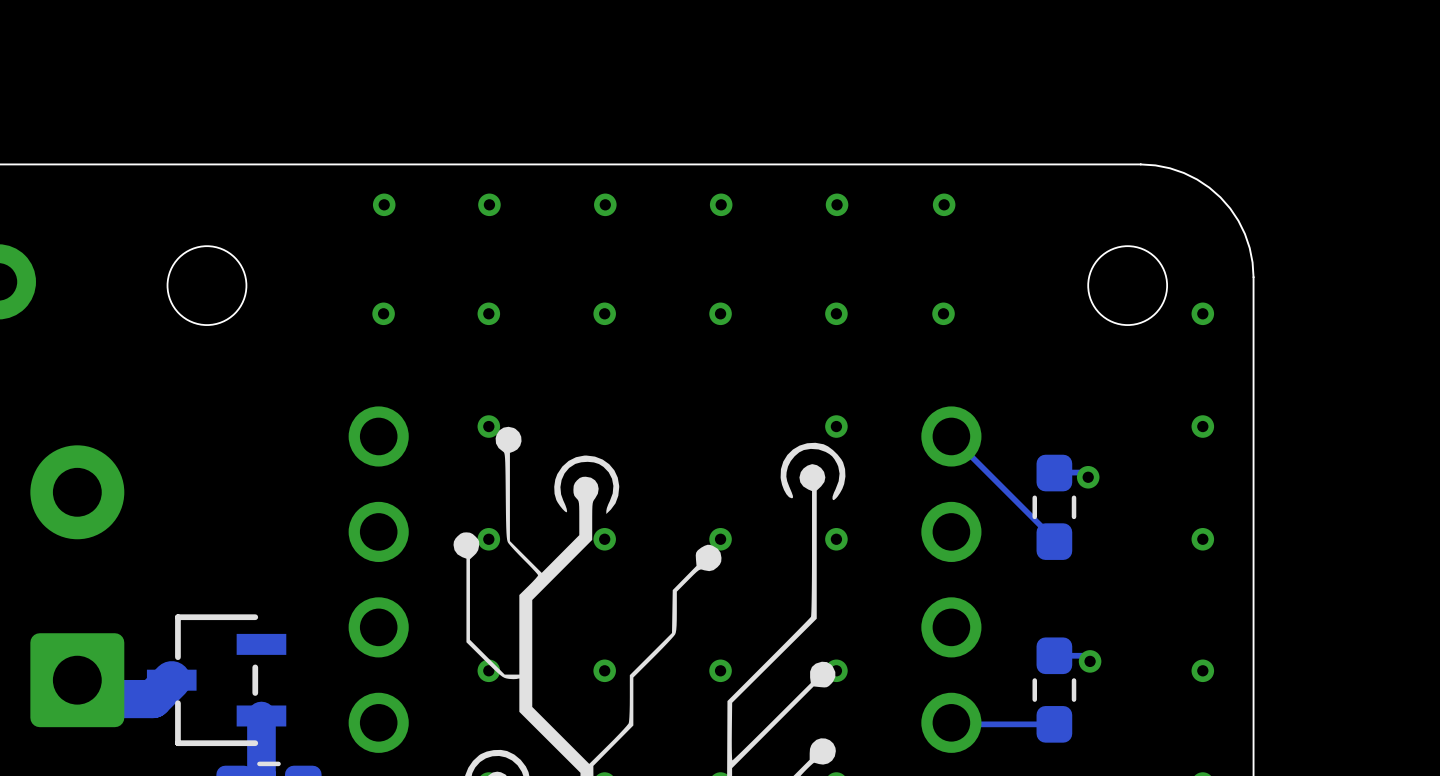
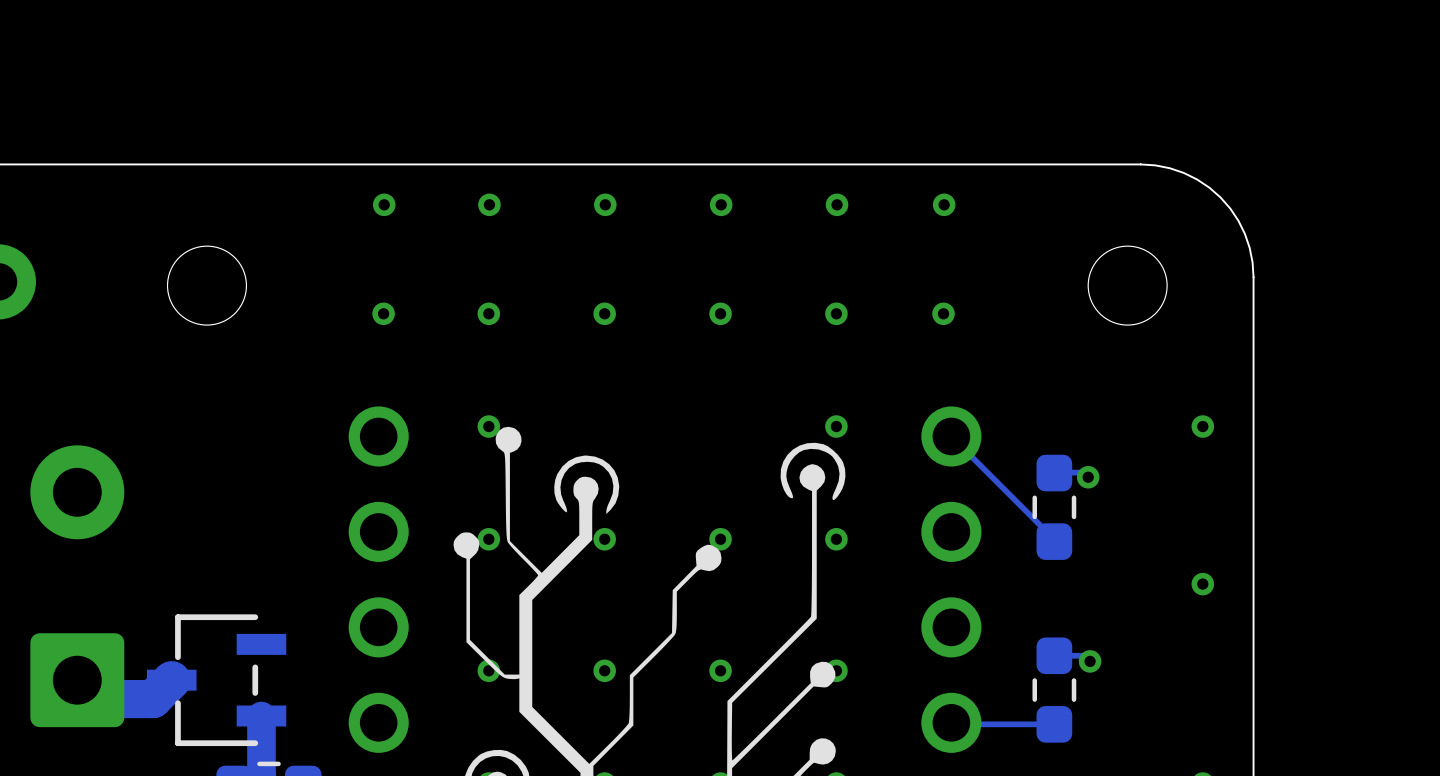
via: (1202, 313) -> none
via: (1202, 539) -> none
via: none -> (1202, 584)
via: (1202, 670) -> none

